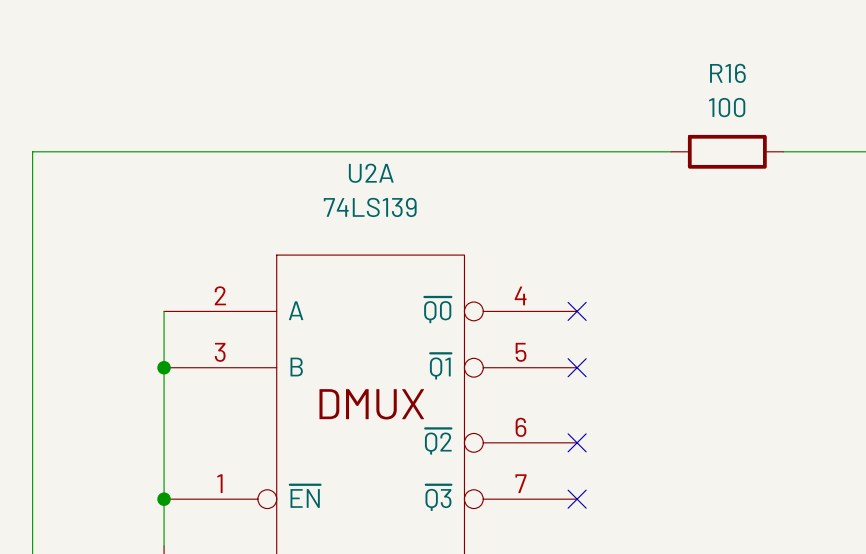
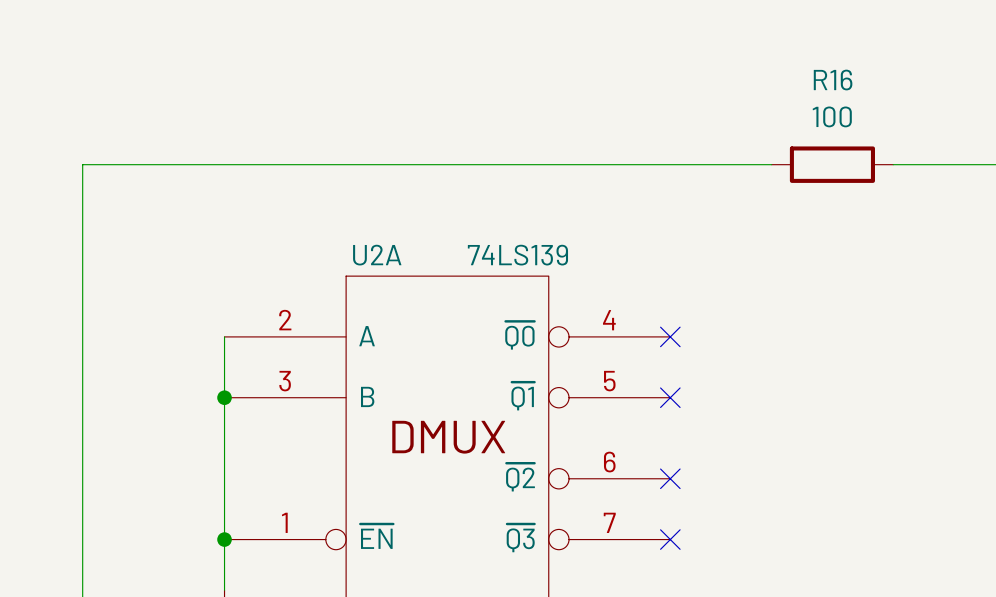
U2A name position: U2A (371, 173) -> U2A (377, 255)
U2A value position: 74LS139 (370, 207) -> 74LS139 (517, 255)

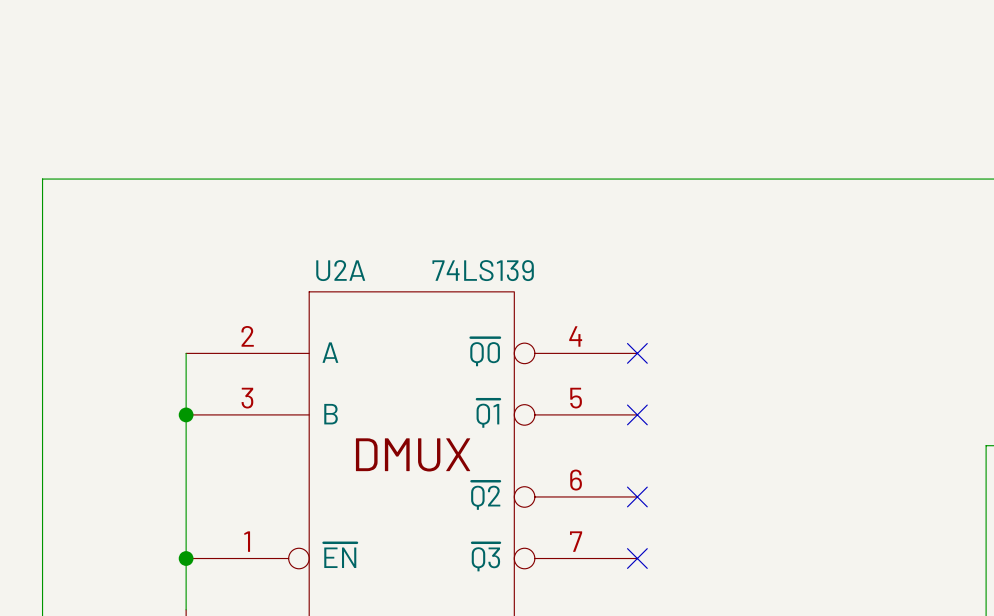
wire: none -> (739, 179) (863, 179)
R16: 100 (832, 164) -> none

